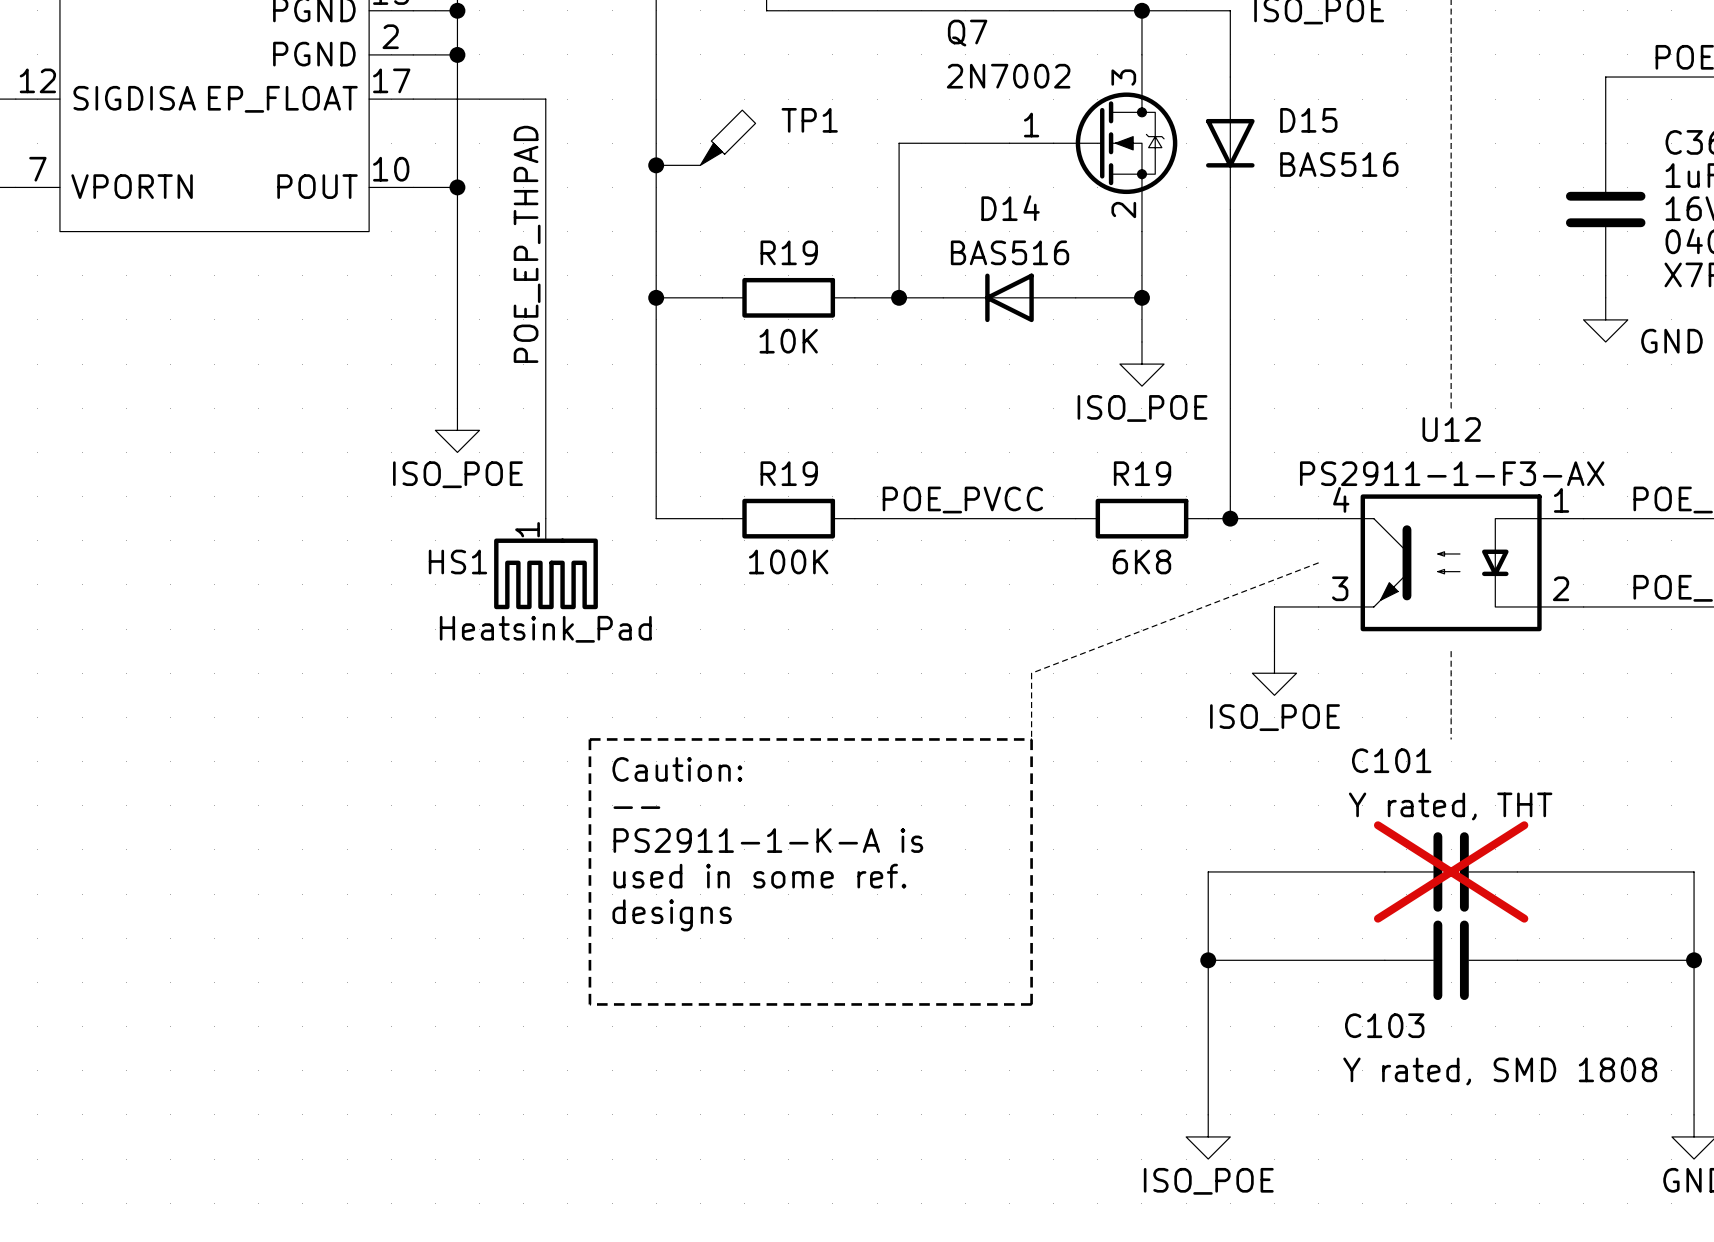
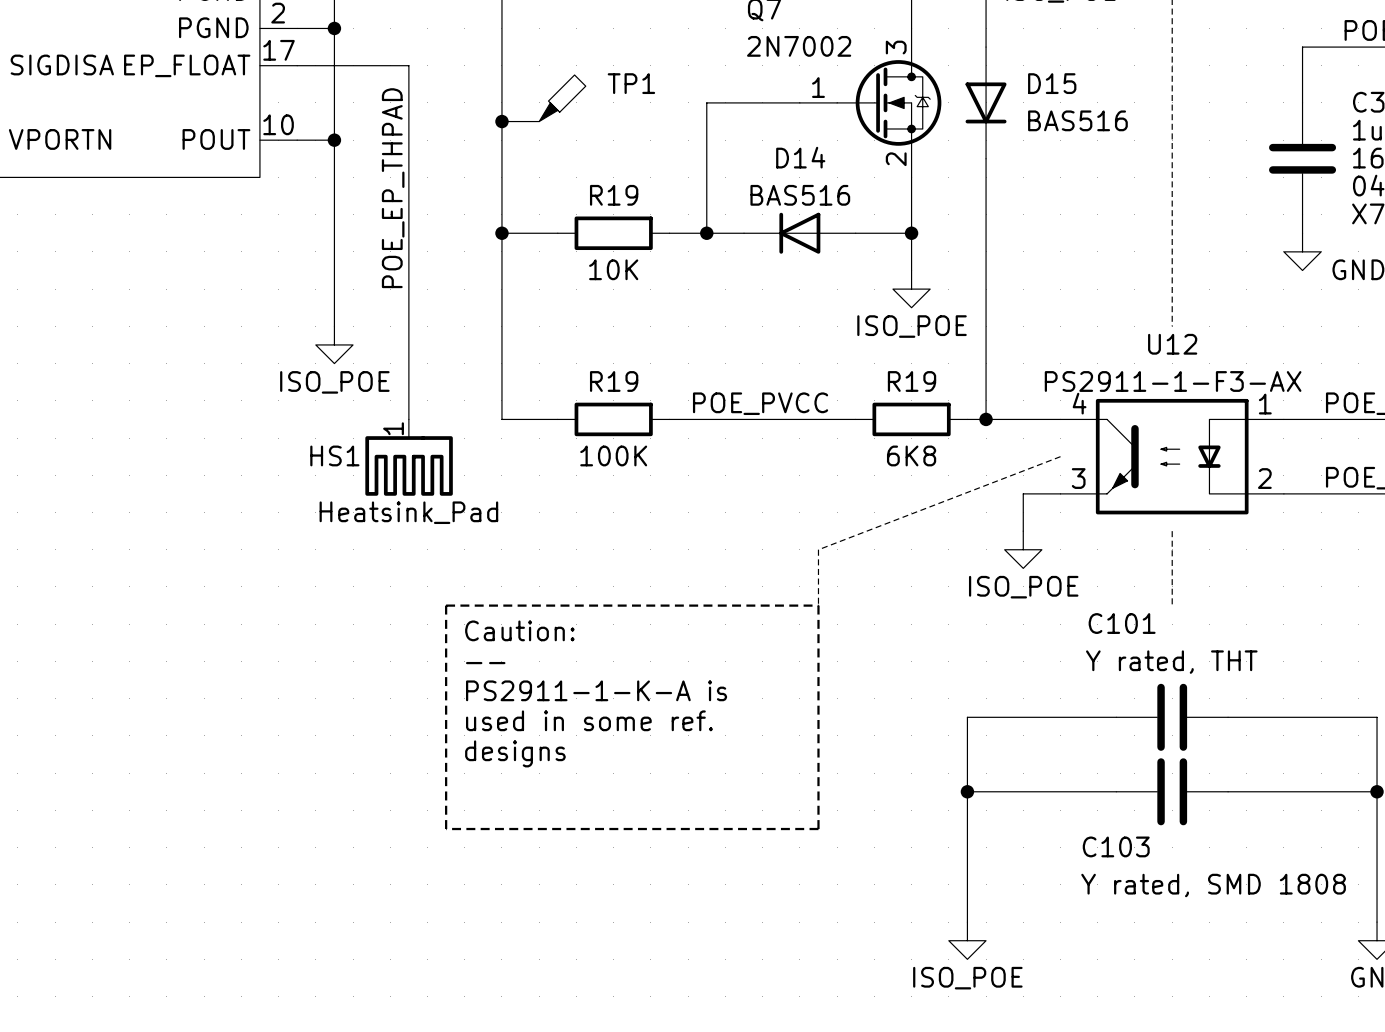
C101 do-not-place cross: (1451, 871) -> none

